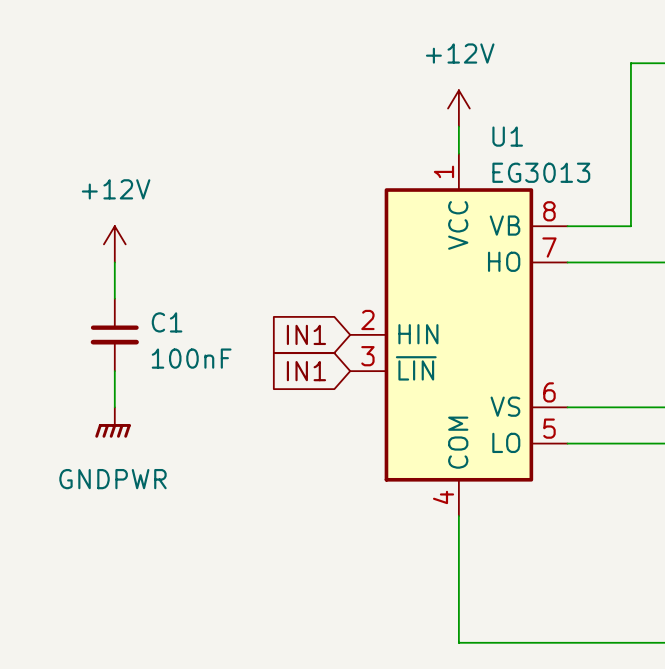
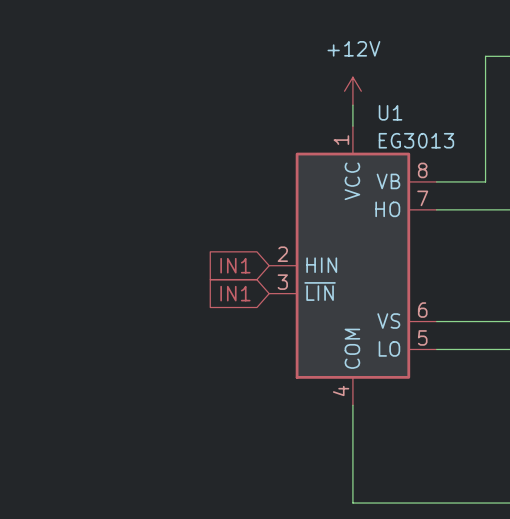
power symbol: +12V (114, 244) -> none
wire: (114, 262) (114, 298) -> none
C1: 100nF (114, 334) -> none
wire: (114, 371) (114, 407) -> none
power symbol: GNDPWR (112, 422) -> none

